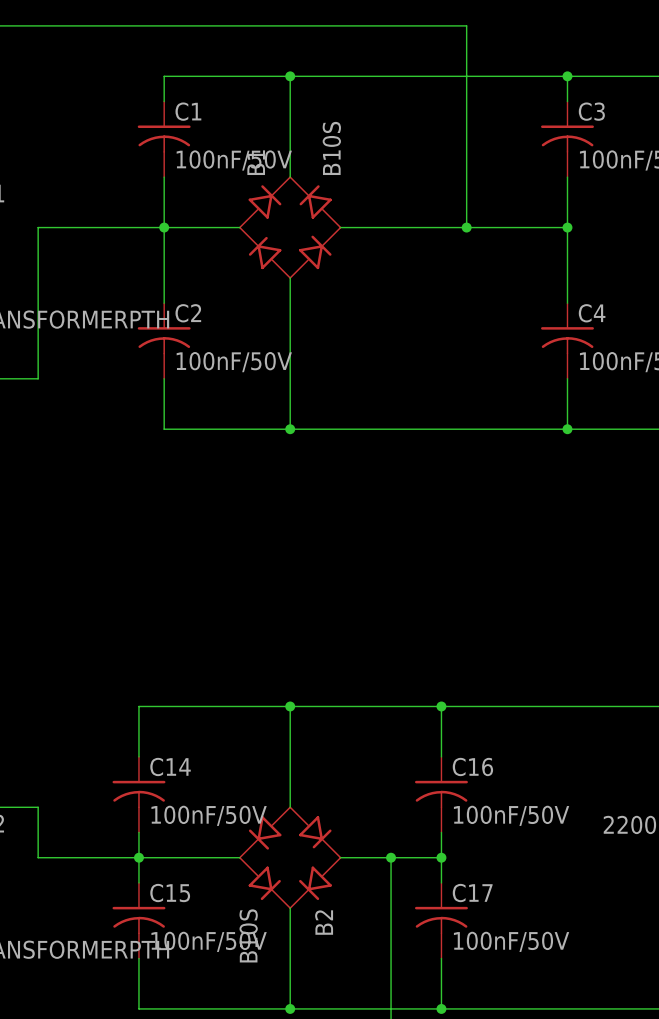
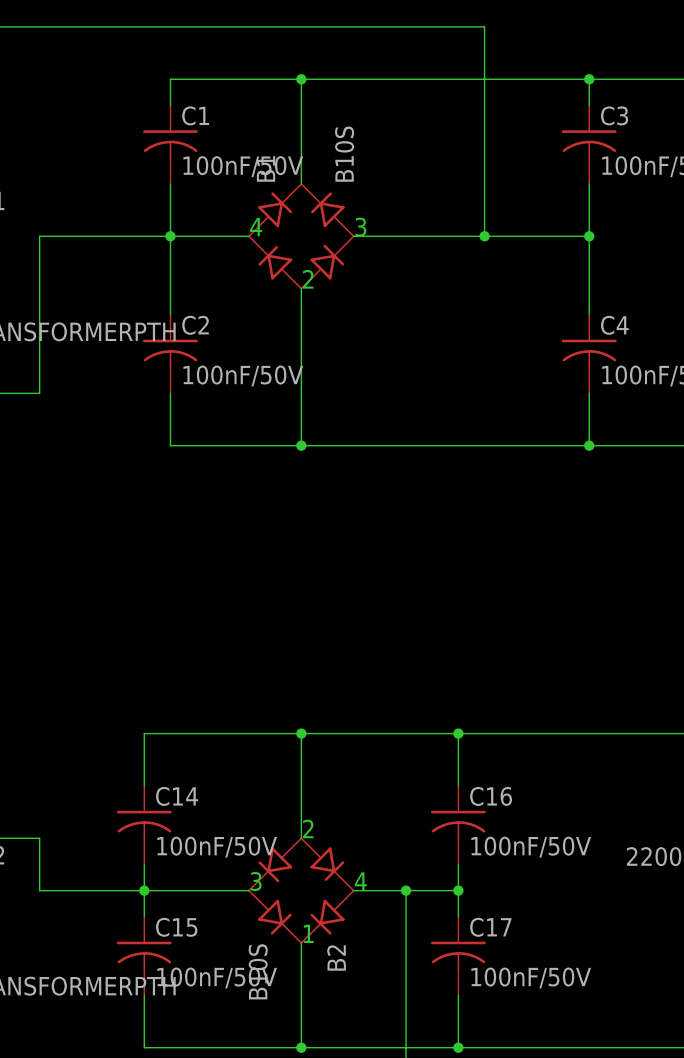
text: none -> 4 (256, 227)
text: none -> 3 (360, 227)
text: none -> 2 (308, 279)
text: none -> 2 (308, 828)
text: none -> 3 (256, 881)
text: none -> 4 (360, 881)
text: none -> 1 (308, 933)

